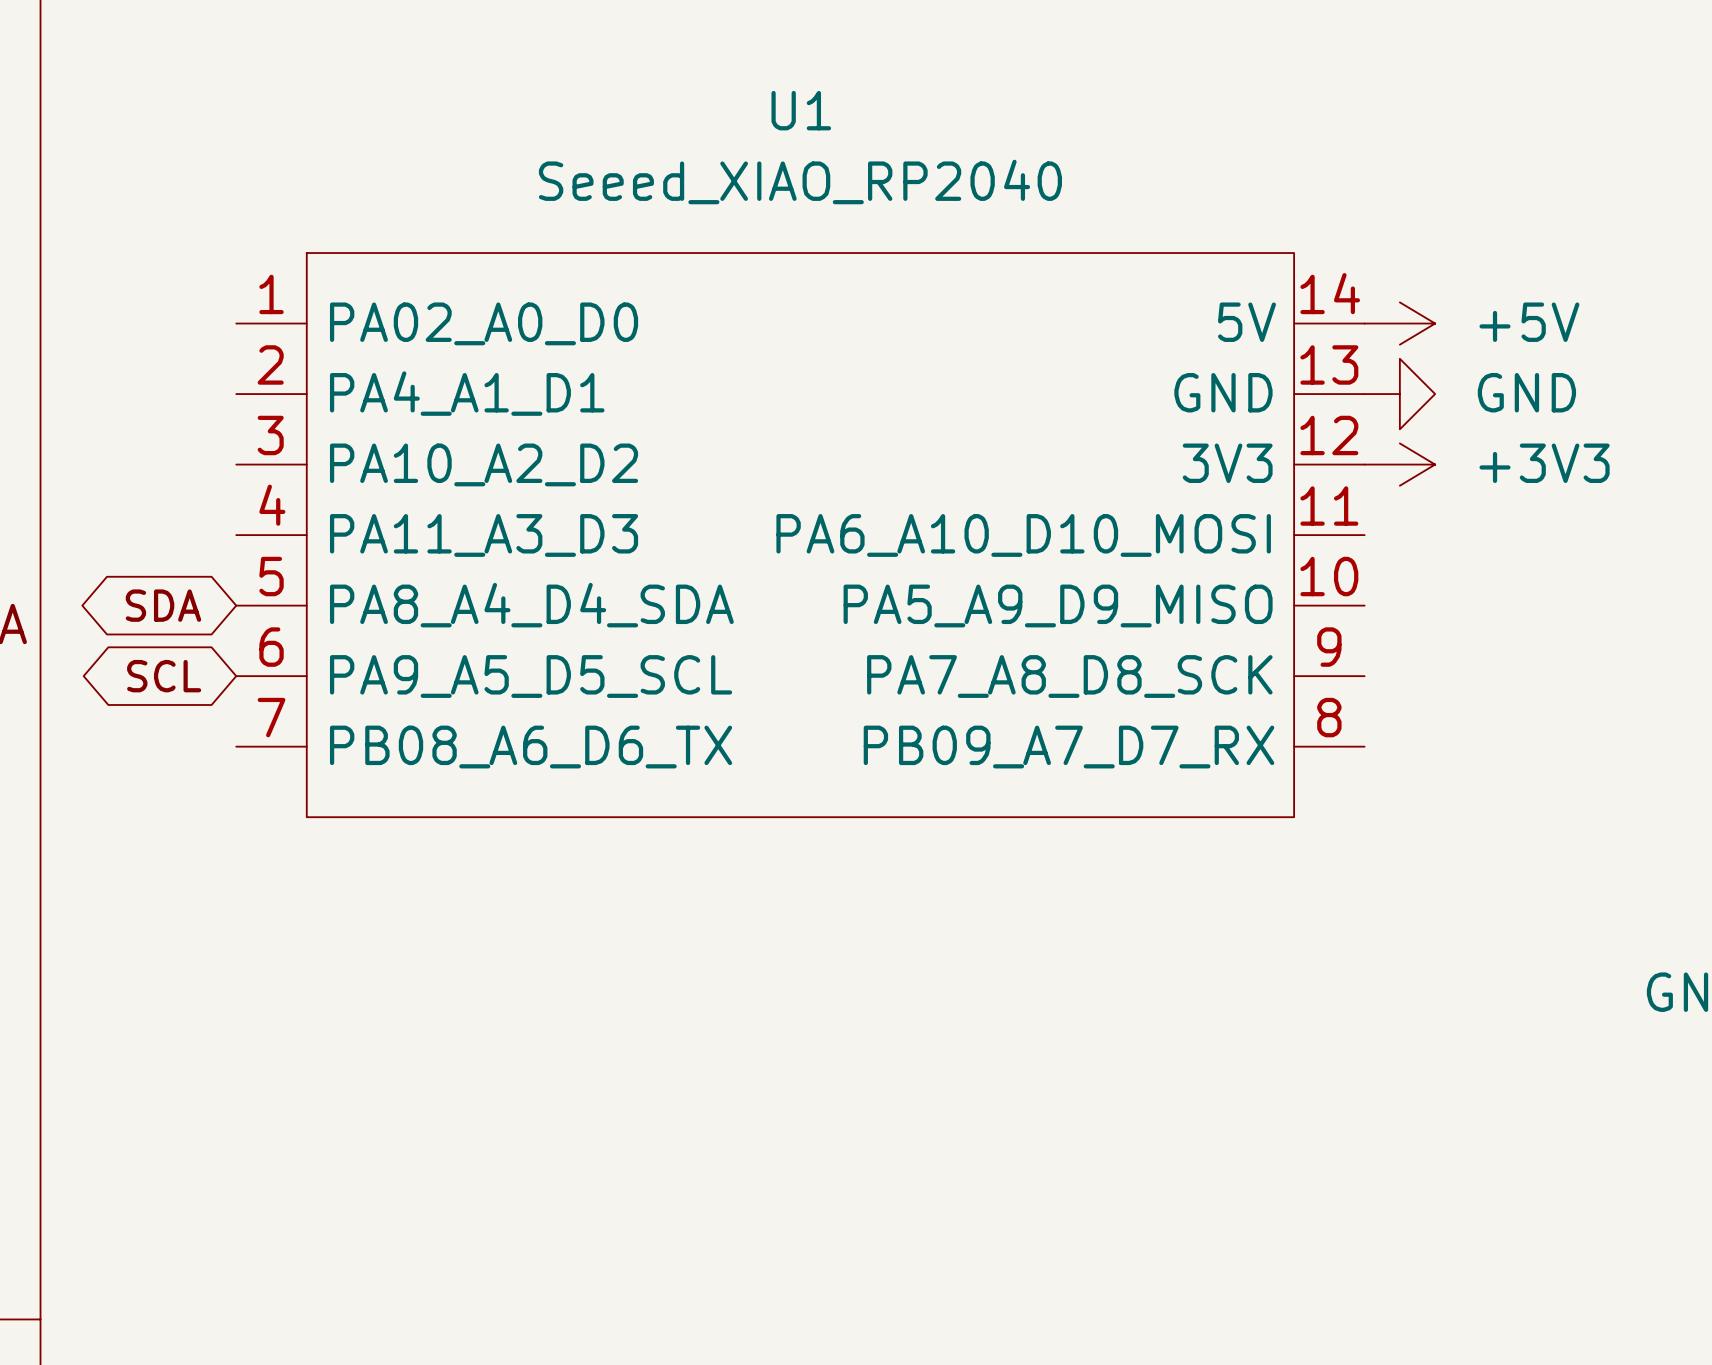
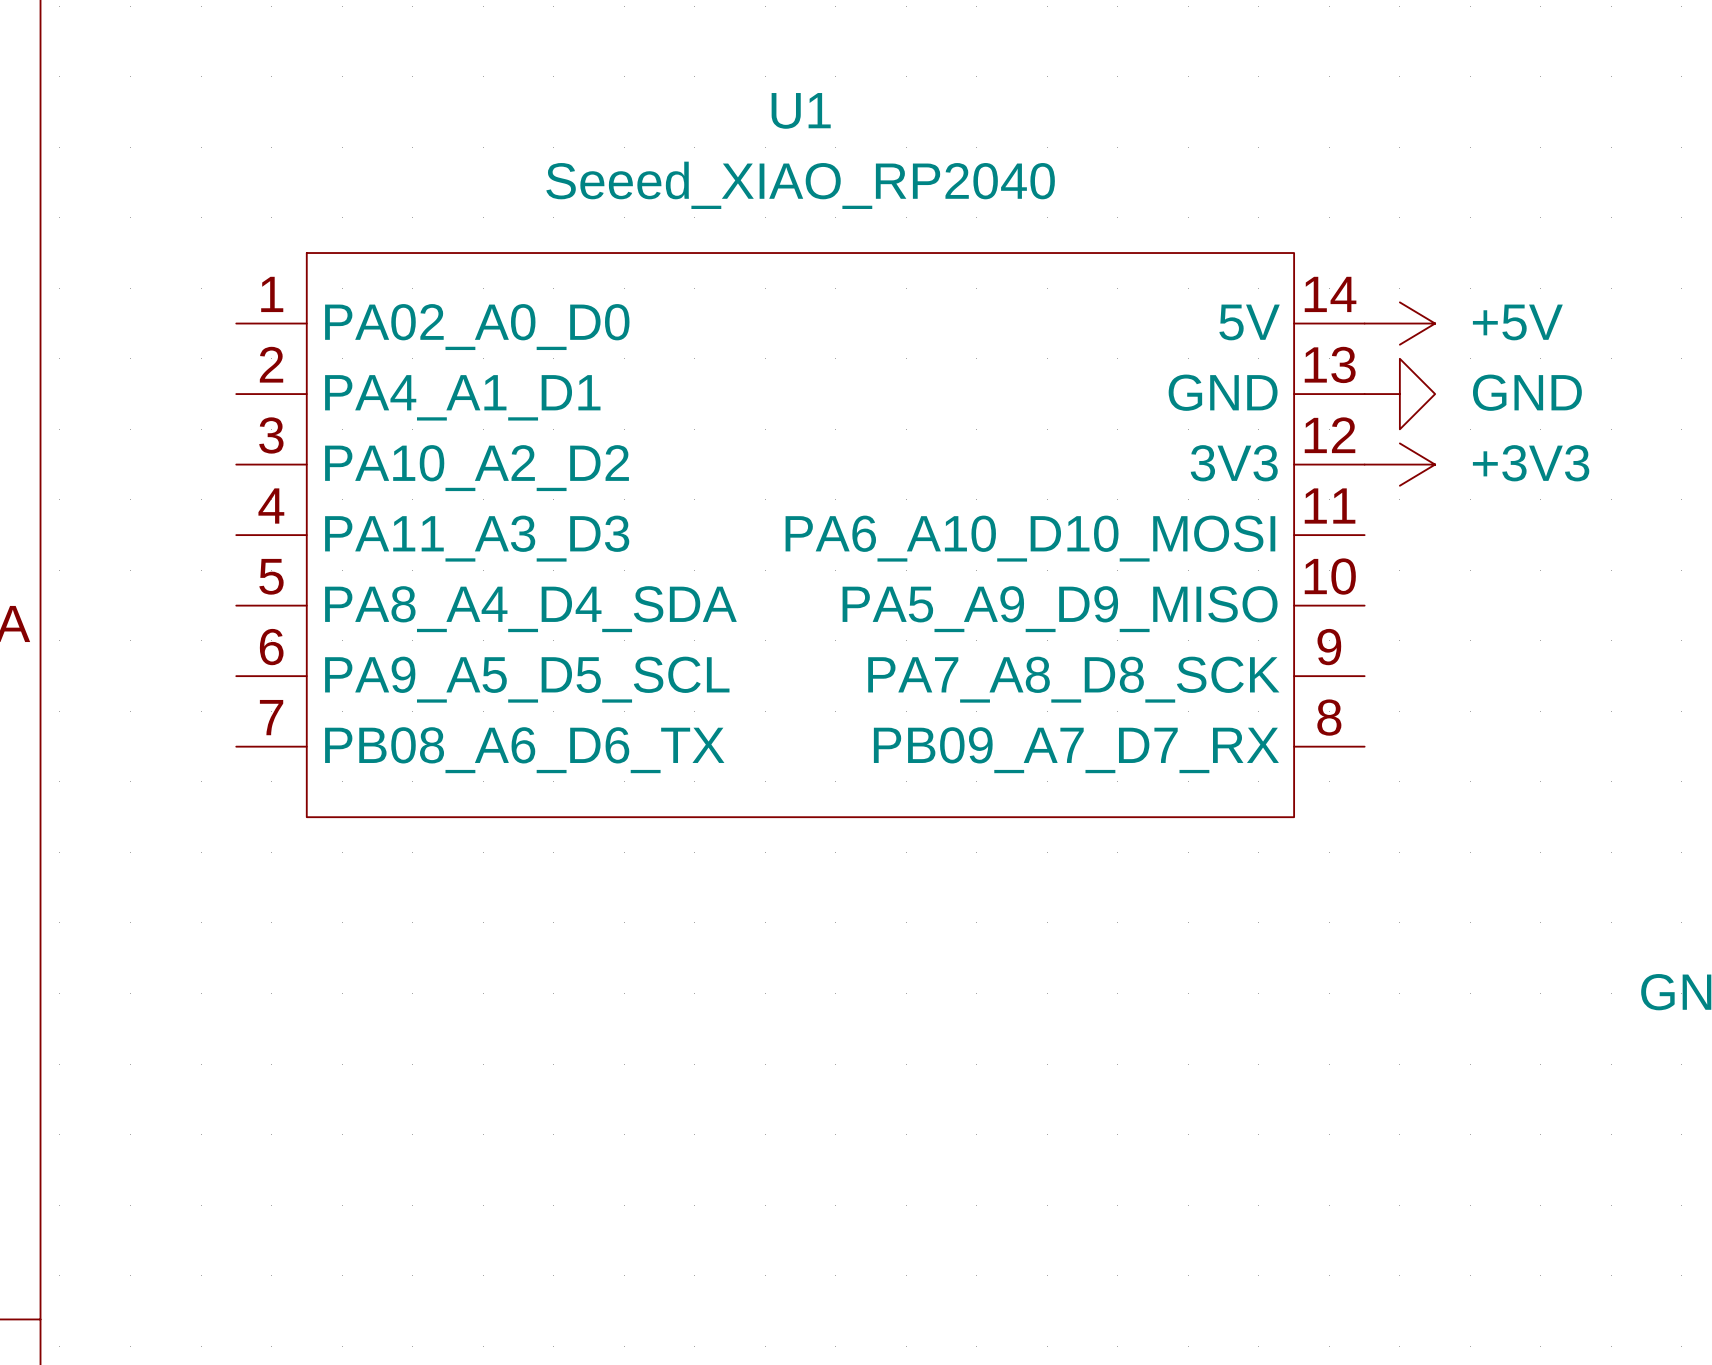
global label: SDA (163, 605) -> none
global label: SCL (164, 676) -> none

